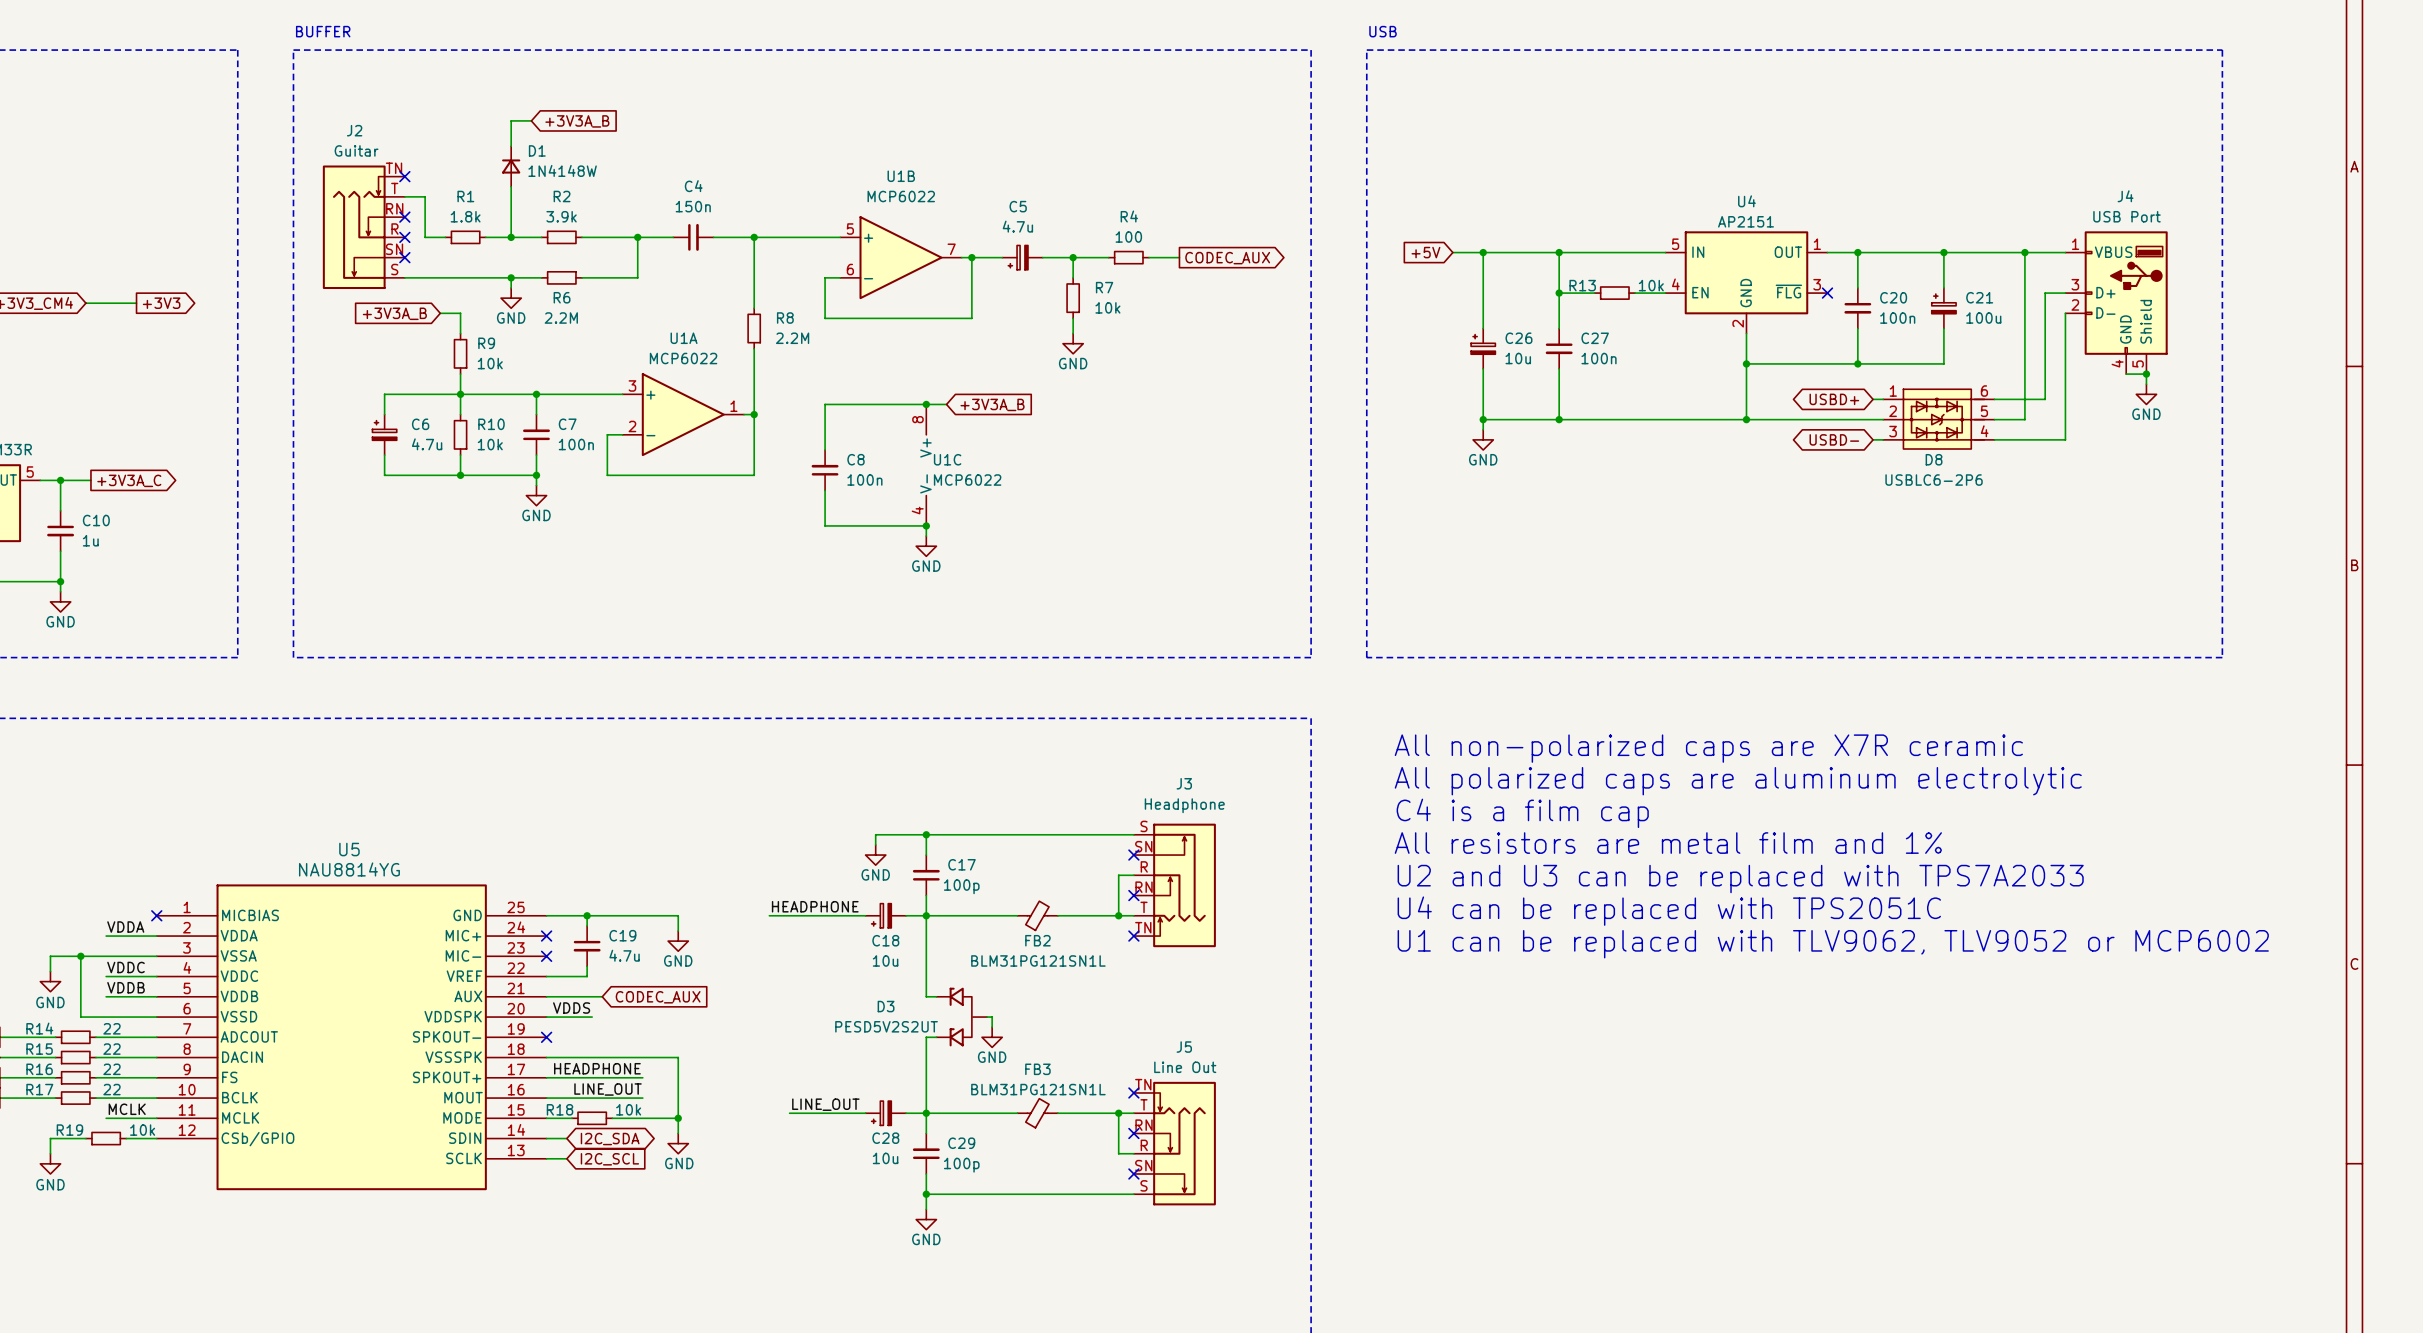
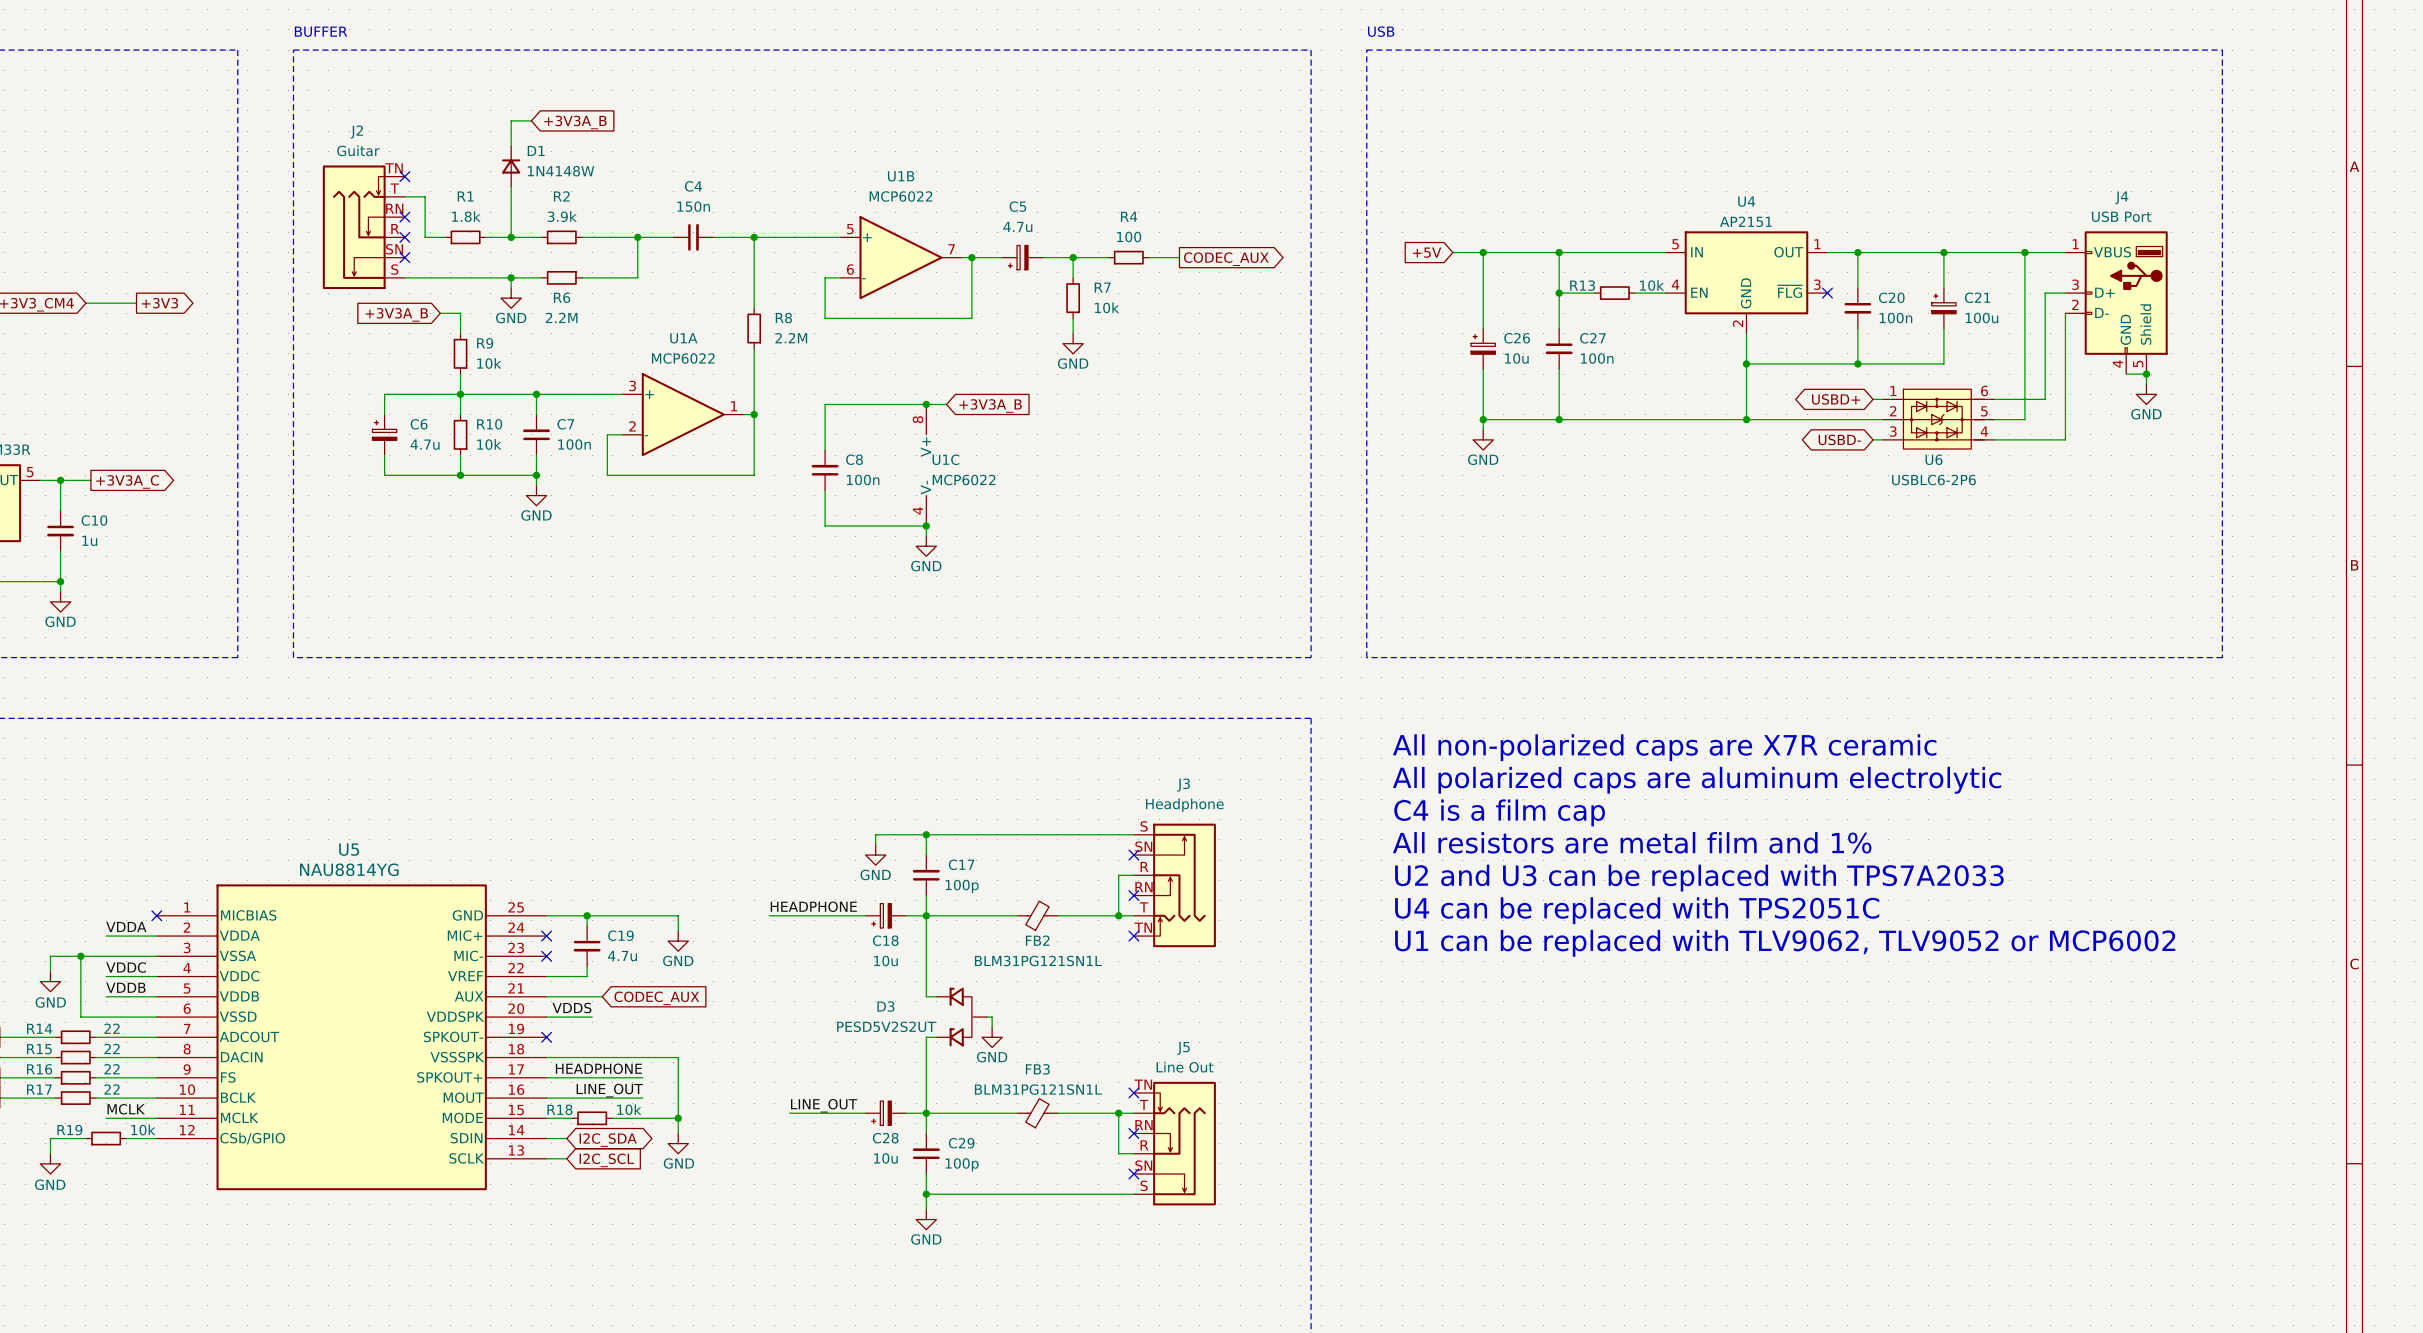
D8 name: D8 (1934, 459) -> U6 (1933, 459)

